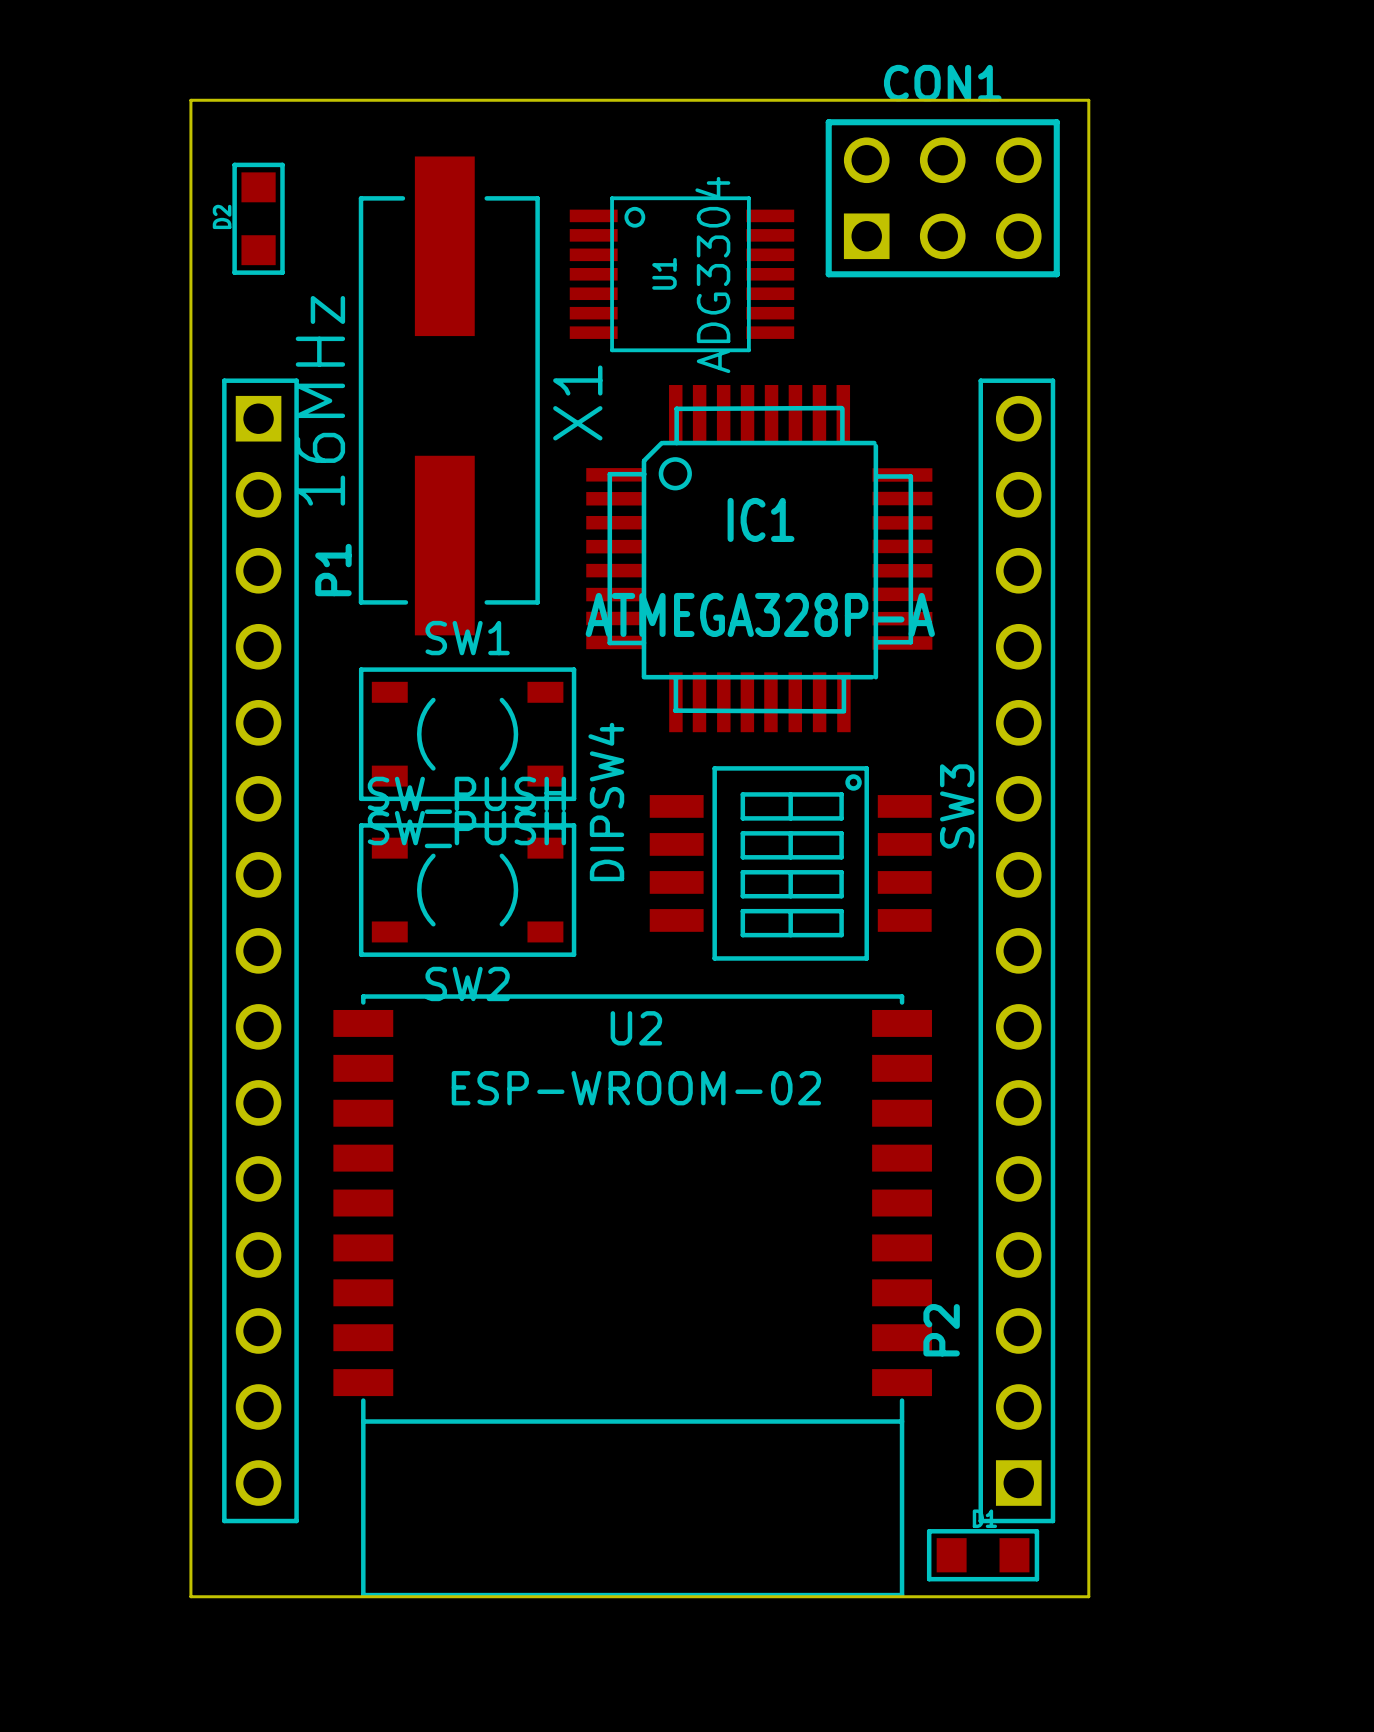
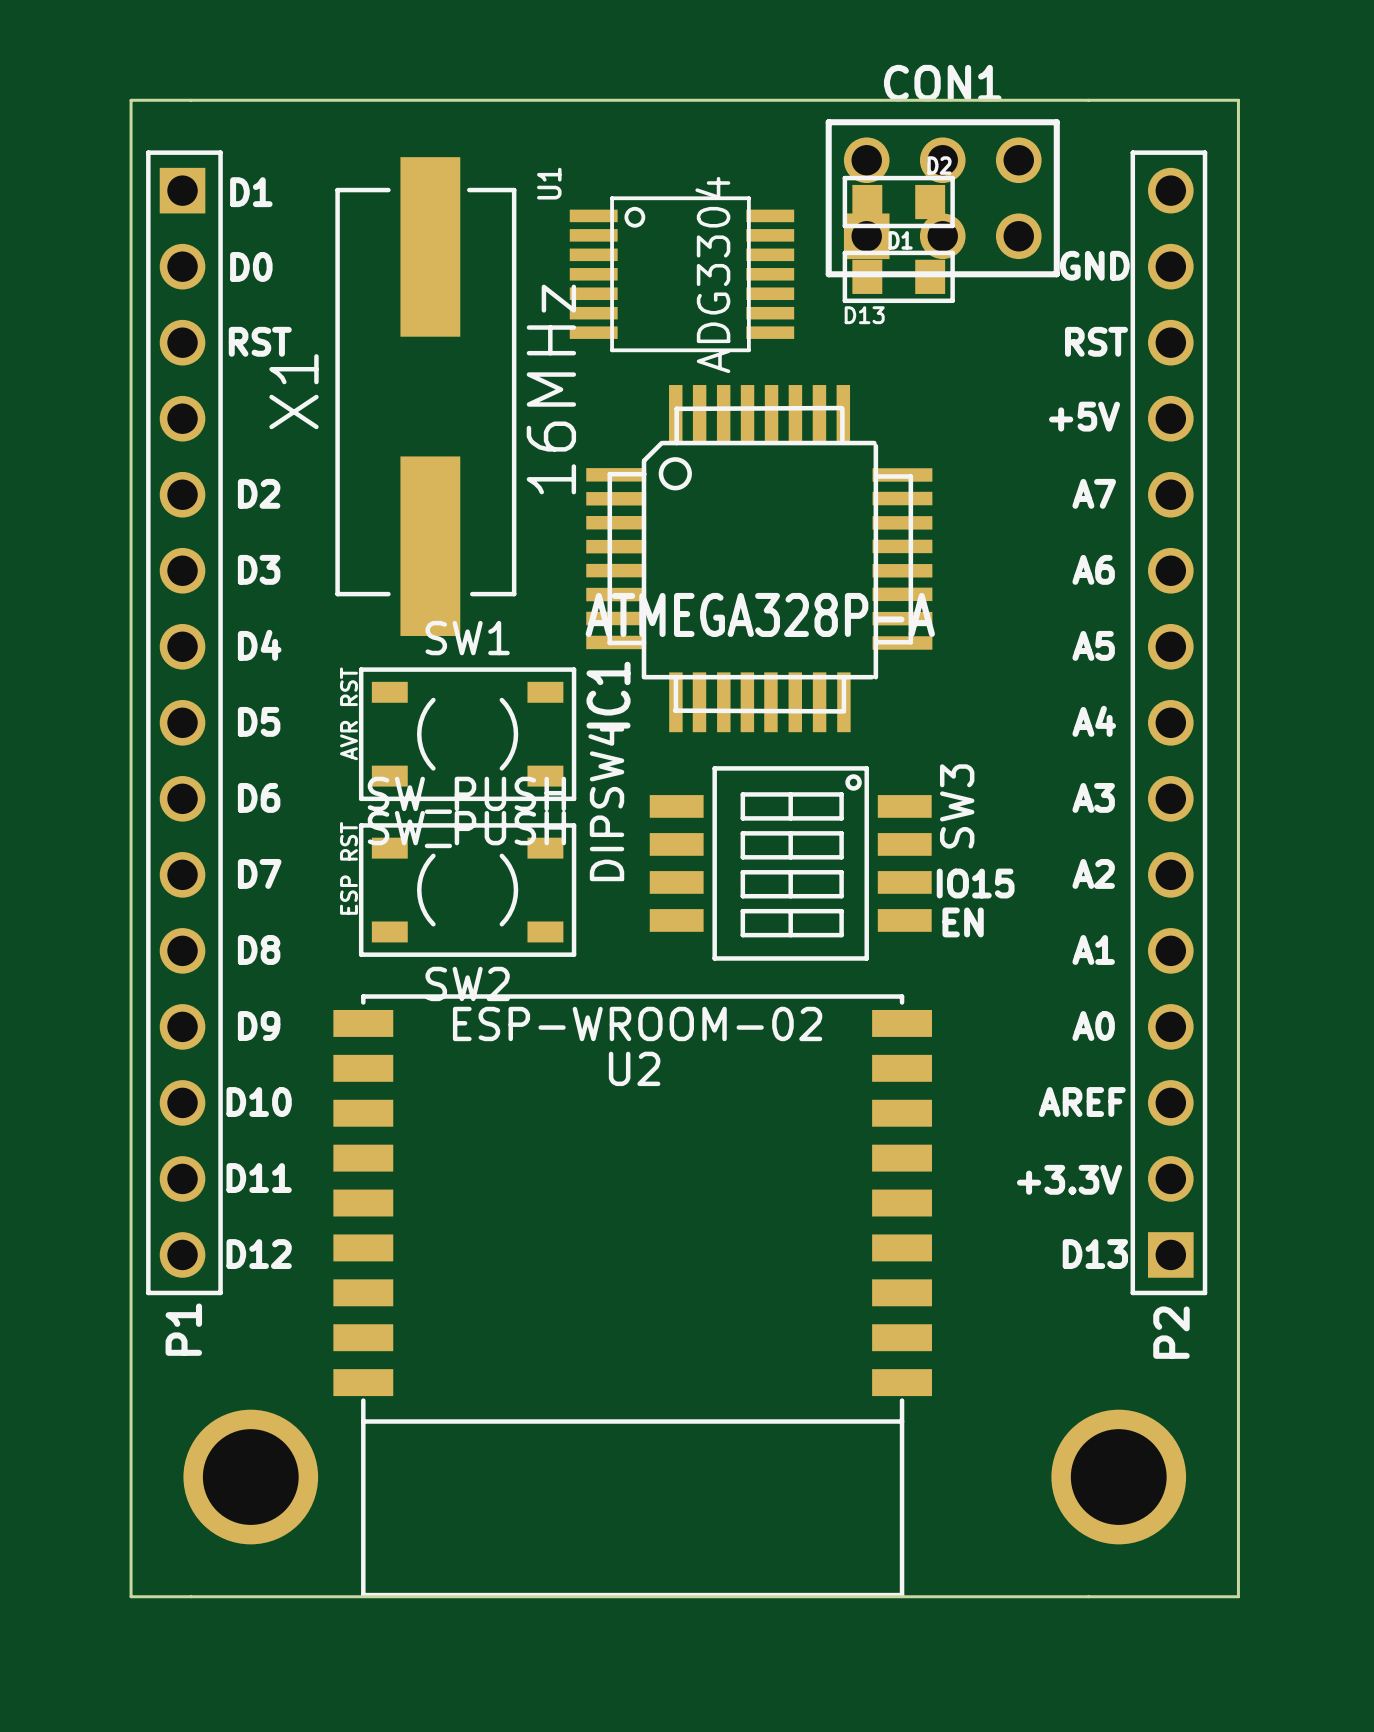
board edge: (190, 100) (190, 1596) -> (190, 100) (131, 100) (131, 1596) (190, 1596)
board edge: (1088, 100) (1088, 1596) -> (1088, 100) (1238, 100) (1238, 1596) (1088, 1596)
text: none -> D1 (251, 192)
D2 rotation: 0° (258, 218) -> 90° clockwise (898, 202)
D2 position: (258, 218) -> (898, 202)
text: none -> GND (1094, 265)
text: none -> D0 (251, 266)
U1 name position: U1 (664, 273) -> U1 (549, 183)
text: none -> D13 (864, 315)
text: none -> RST (260, 341)
text: none -> RST (1096, 341)
X1 rotation: 0° (449, 395) -> 180° (425, 396)
text: none -> +5V (1084, 416)
text: none -> D2 (259, 493)
text: none -> A7 (1094, 493)
IC1 name rotation: 0° (761, 519) -> 90° counterclockwise (608, 695)
IC1 name position: IC1 (761, 519) -> IC1 (608, 695)
text: none -> D3 (259, 569)
text: none -> A6 (1093, 569)
P1 name position: P1 (333, 570) -> P1 (183, 1329)
text: none -> D4 (259, 645)
text: none -> A5 (1093, 645)
text: none -> AVR RST (348, 713)
text: none -> D5 (259, 721)
text: none -> A4 (1094, 721)
text: none -> D6 (259, 797)
text: none -> A3 (1093, 797)
text: none -> ESP RST (348, 868)
text: none -> D7 (259, 873)
text: none -> A2 (1093, 873)
text: none -> IO15 (975, 883)
text: none -> EN (963, 922)
text: none -> D8 (259, 949)
text: none -> A1 (1093, 949)
P1 position: (260, 950) -> (184, 722)
P2 position: (1016, 950) -> (1168, 722)
text: none -> D9 (259, 1025)
text: none -> A0 (1093, 1025)
U2 name position: U2 (636, 1028) -> U2 (634, 1068)
U2 value position: ESP-WROOM-02 (636, 1088) -> ESP-WROOM-02 (637, 1023)
text: none -> D10 (259, 1102)
text: none -> AREF (1082, 1102)
text: none -> D11 (259, 1178)
text: none -> +3.3V (1069, 1179)
text: none -> D12 (259, 1254)
text: none -> D13 (1095, 1254)
P2 name position: P2 (941, 1330) -> P2 (1171, 1332)
part: none -> (250, 1477)
part: none -> (1118, 1477)
D1 position: (983, 1555) -> (898, 276)

